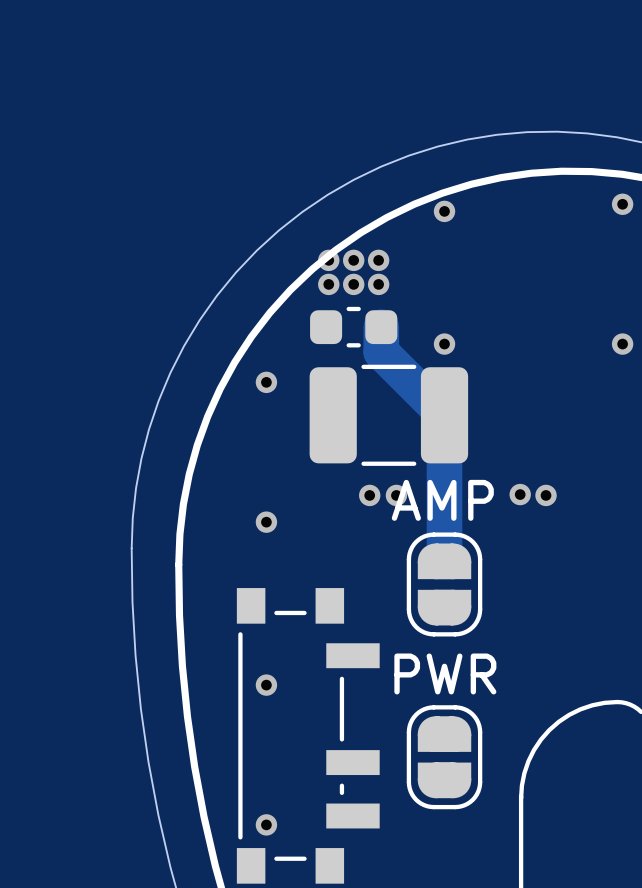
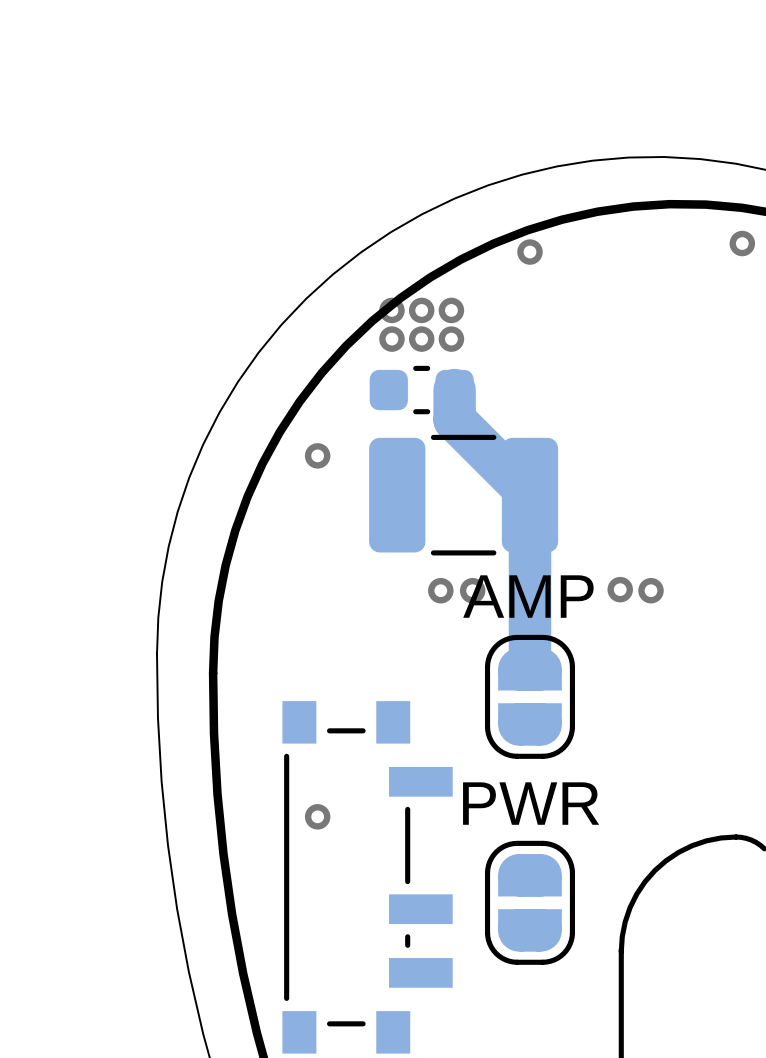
via: (444, 344) -> none
via: (622, 344) -> none
via: (266, 522) -> none
via: (266, 824) -> none

